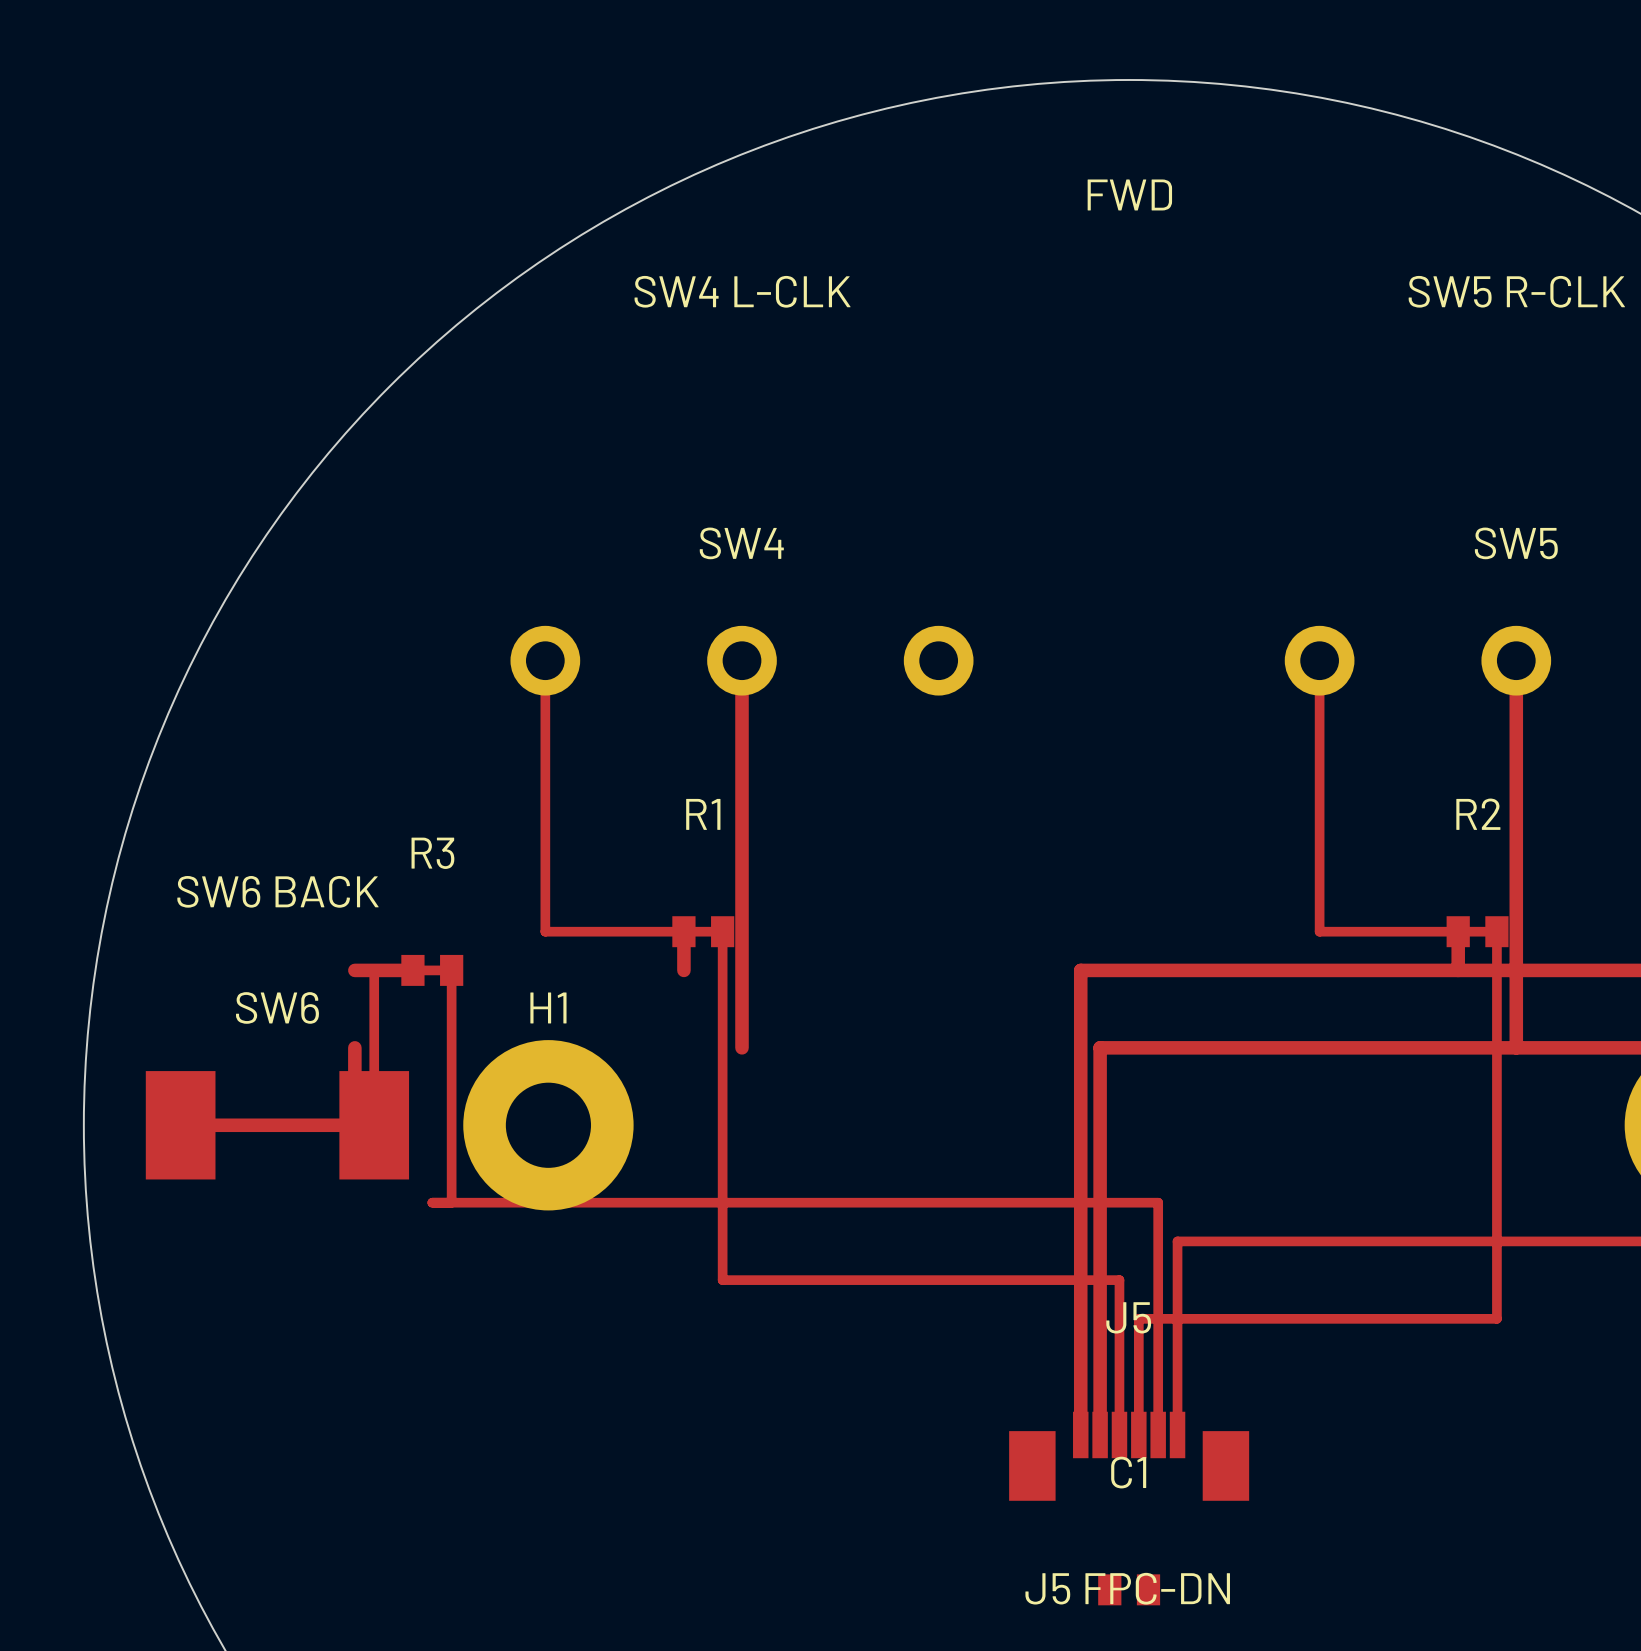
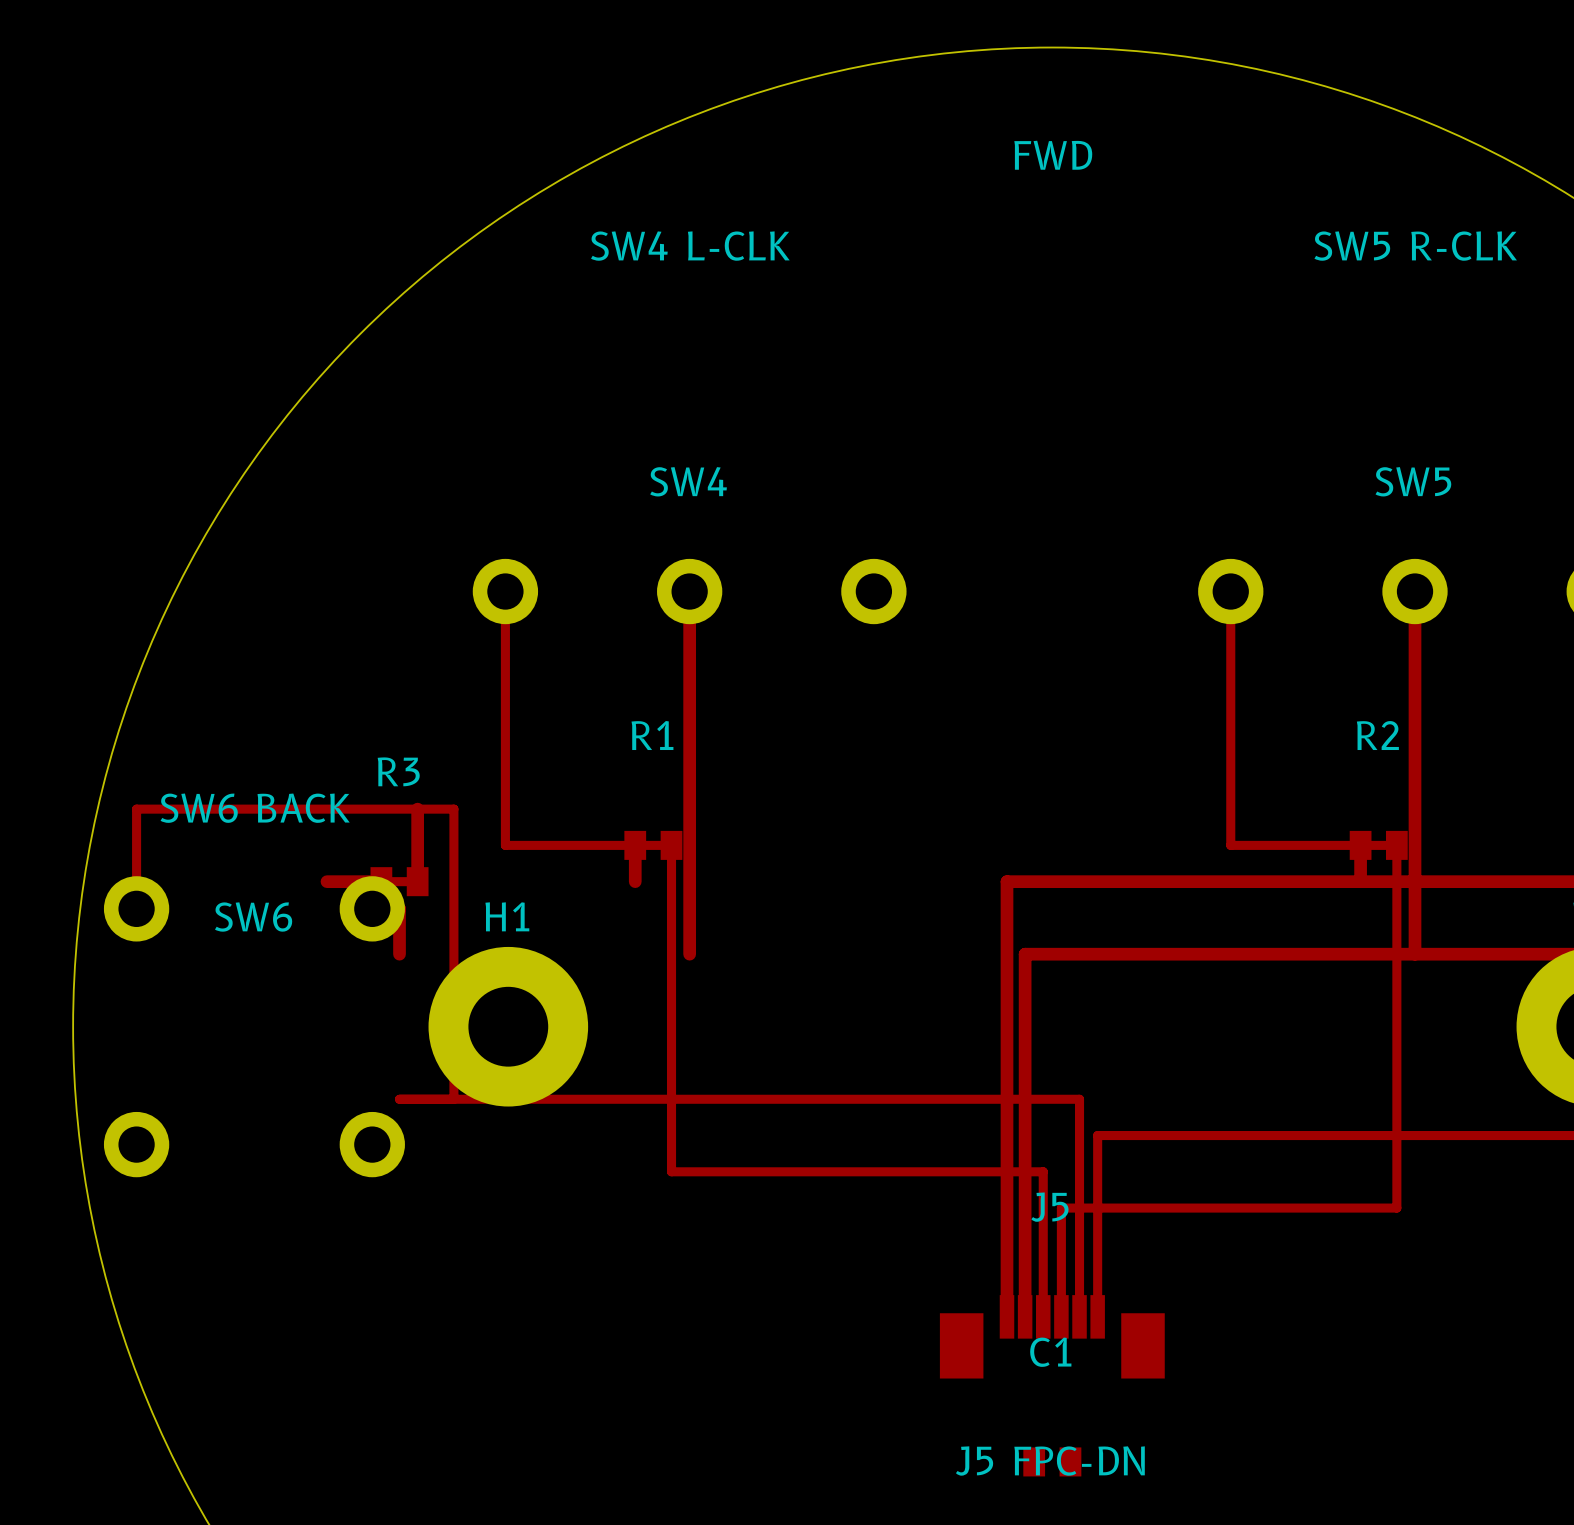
track: (412, 970) (374, 970) (374, 1125) -> none
track: (451, 970) (451, 1202) -> (417, 881) (417, 809)
track: none -> (136, 908) (136, 809) (453, 809) (453, 1099)
track: none -> (372, 908) (399, 908) (399, 954)
track: (354, 1047) (354, 1125) (180, 1125) -> none
SW6 footprint: [145, 1071, 410, 1180] -> [103, 876, 405, 1178]

